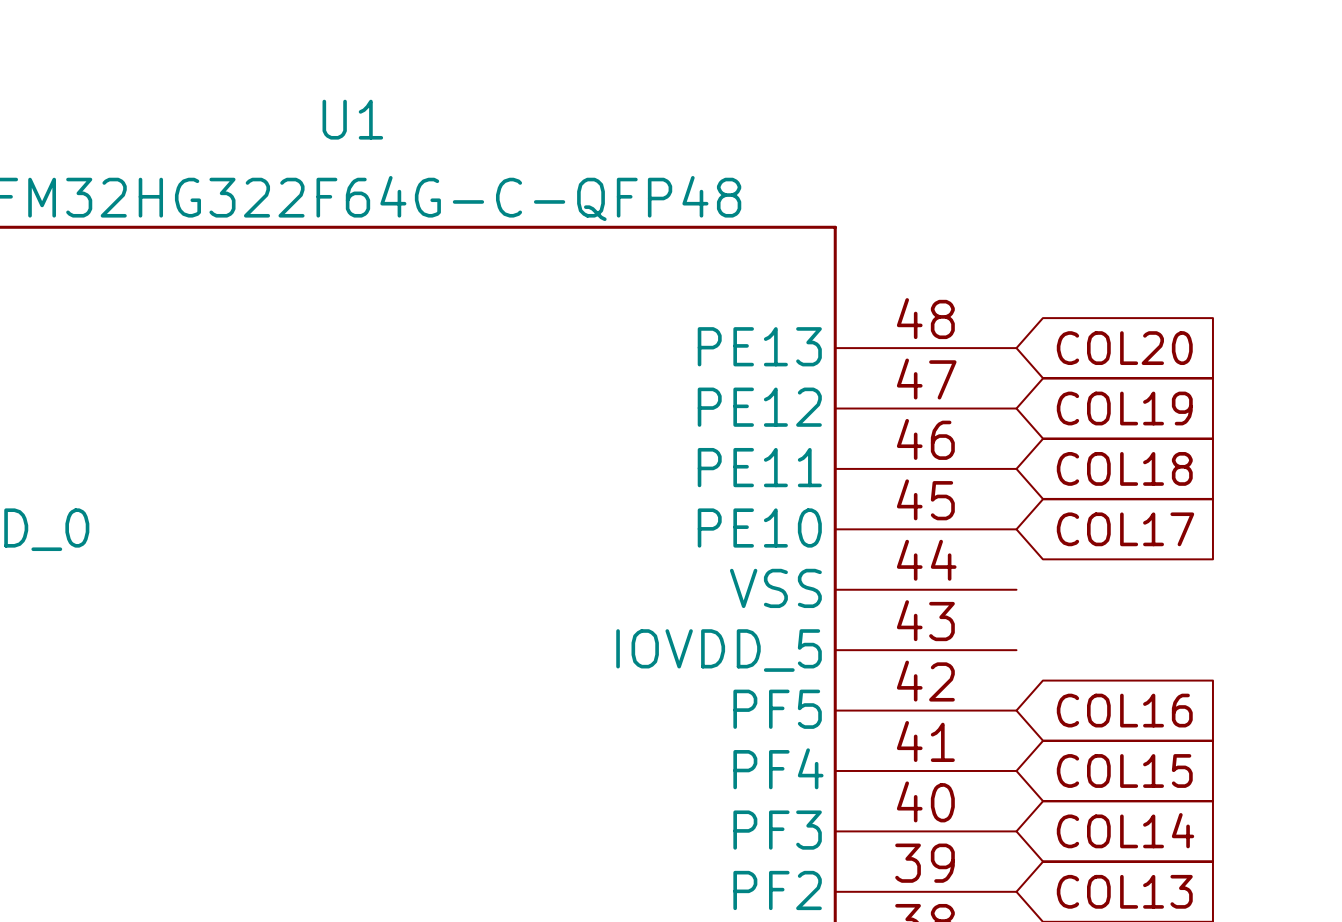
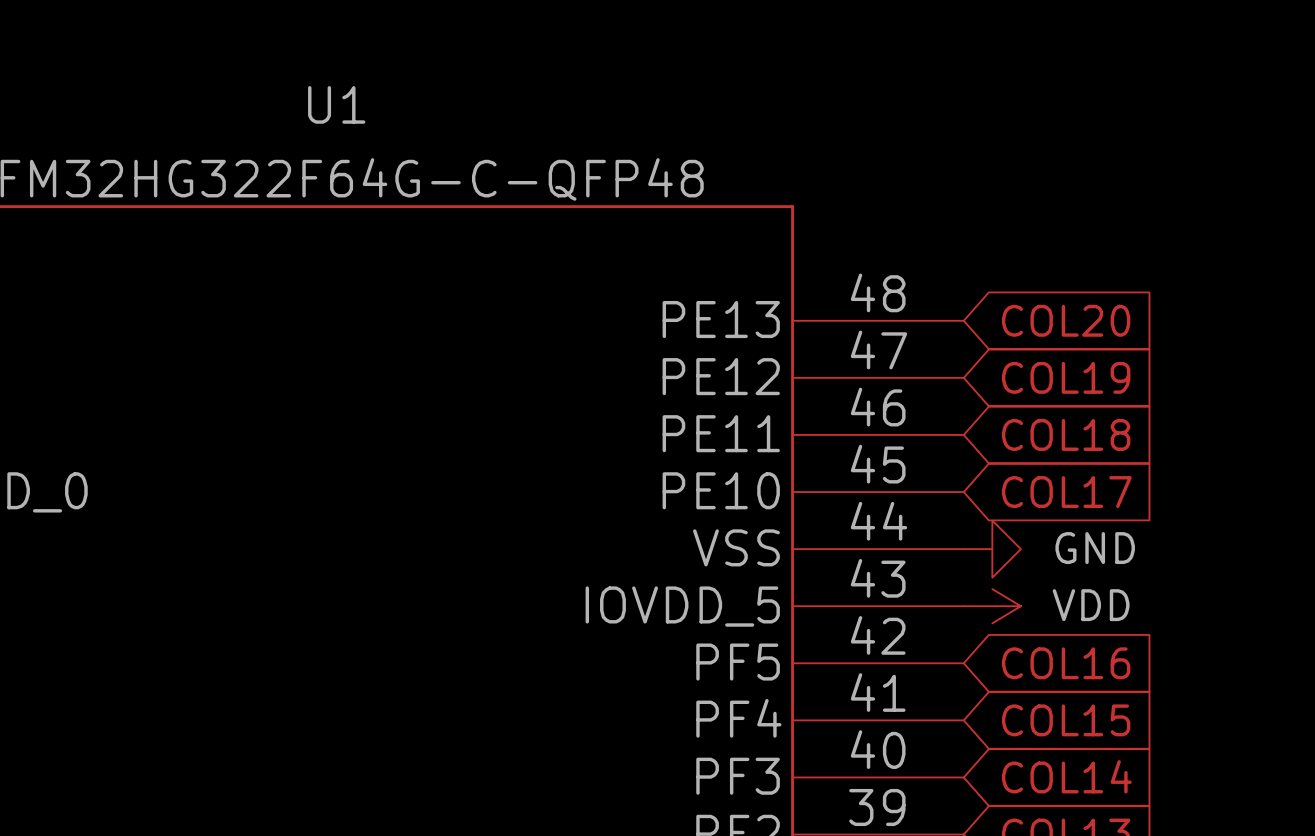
power symbol: none -> GND (992, 549)
power symbol: none -> VDD (992, 606)

